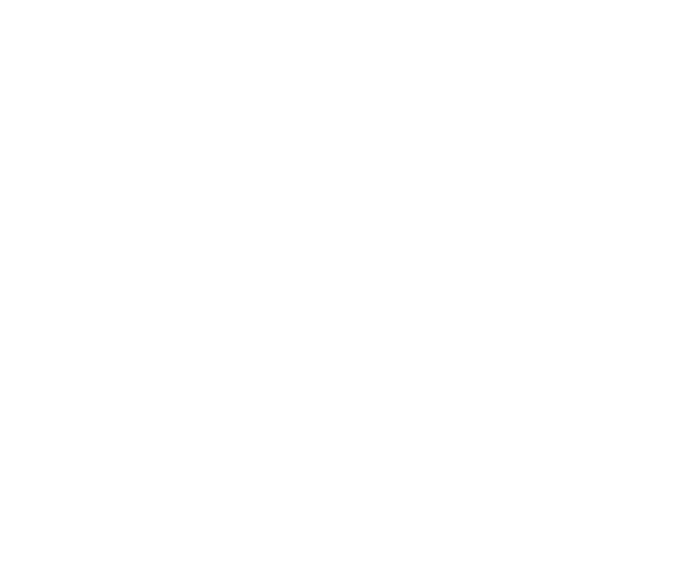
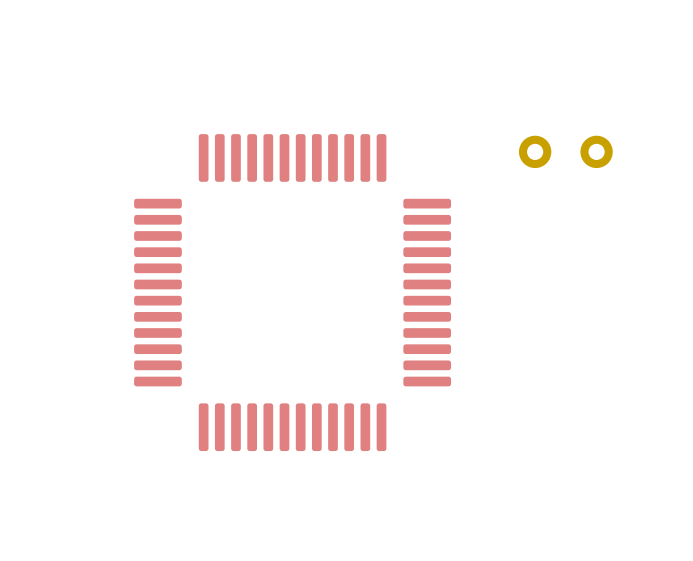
part: none -> (565, 151)
part: none -> (292, 292)

